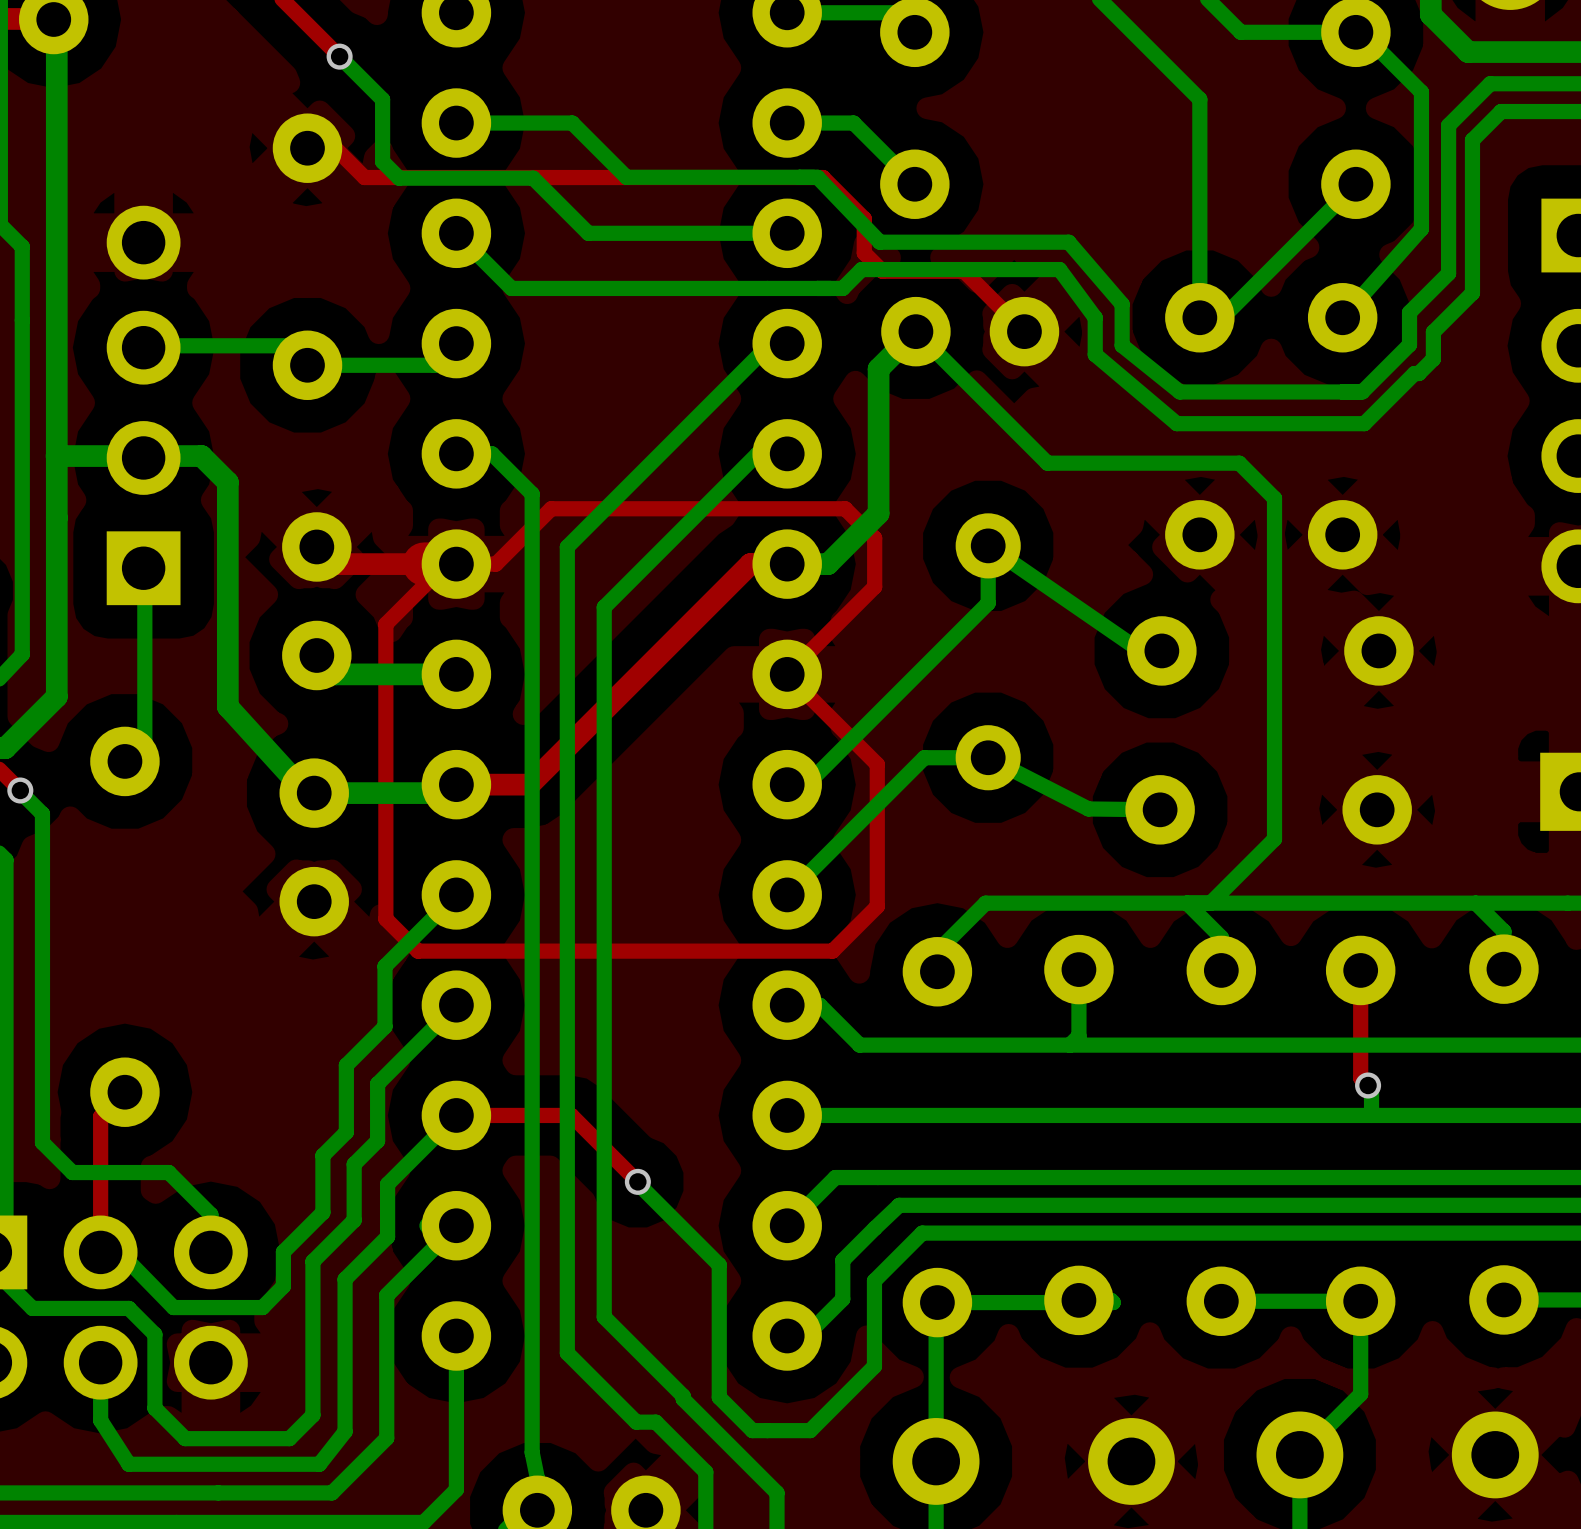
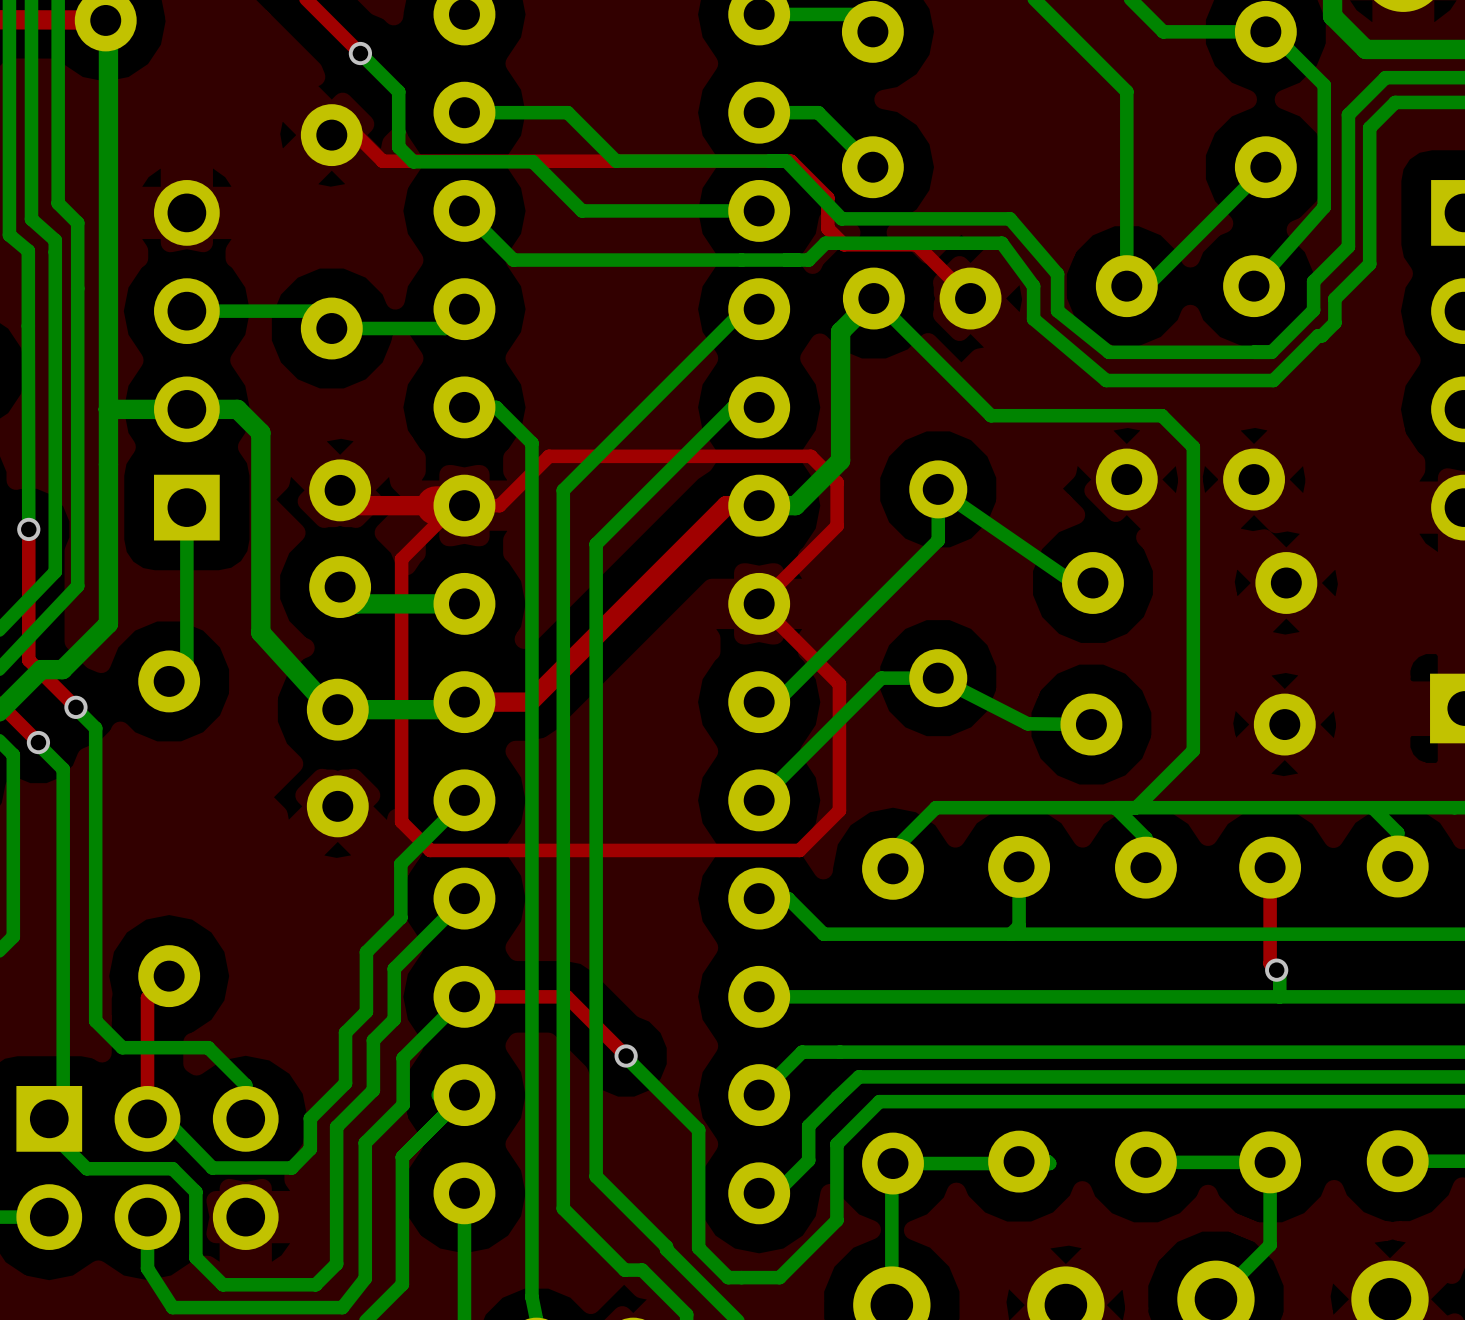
part footprint: [106, 205, 181, 606] -> [154, 180, 220, 541]

